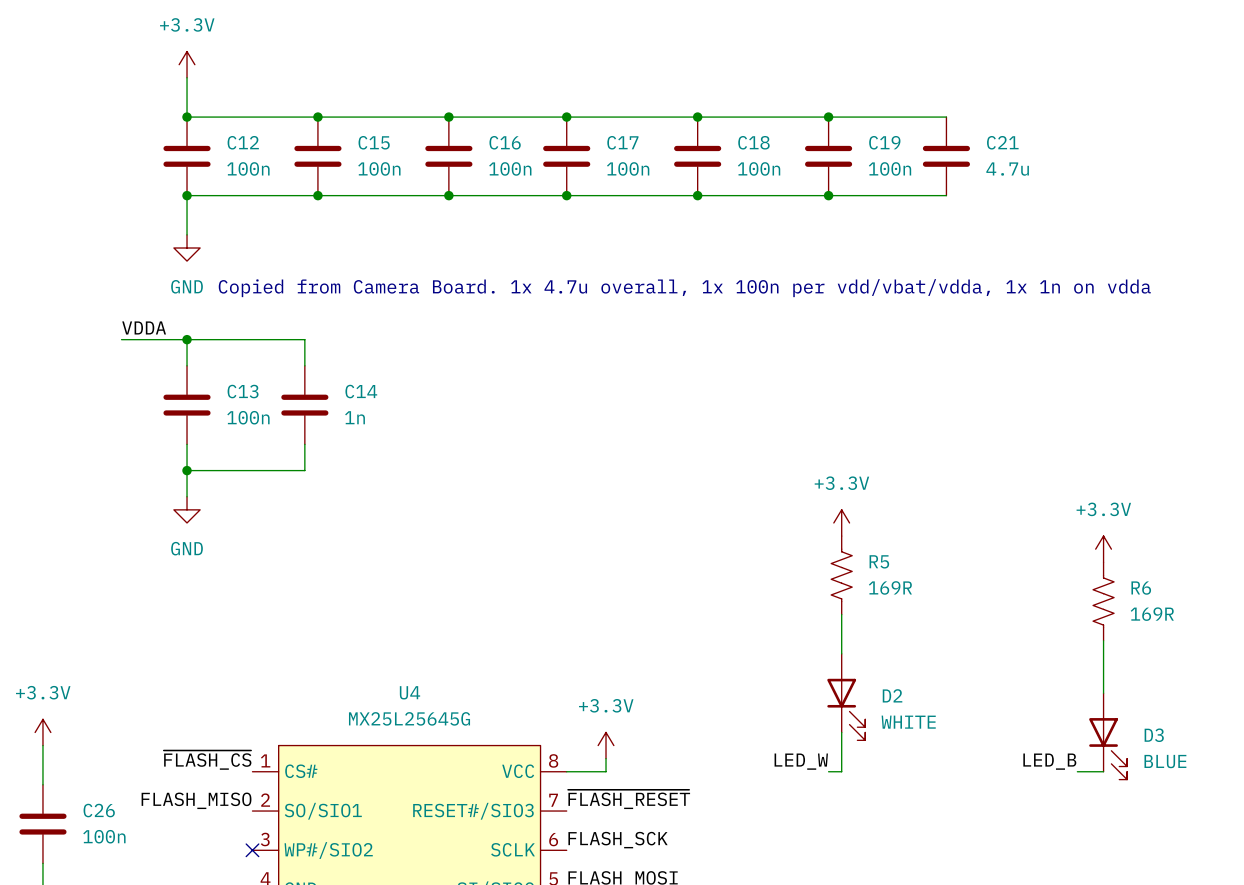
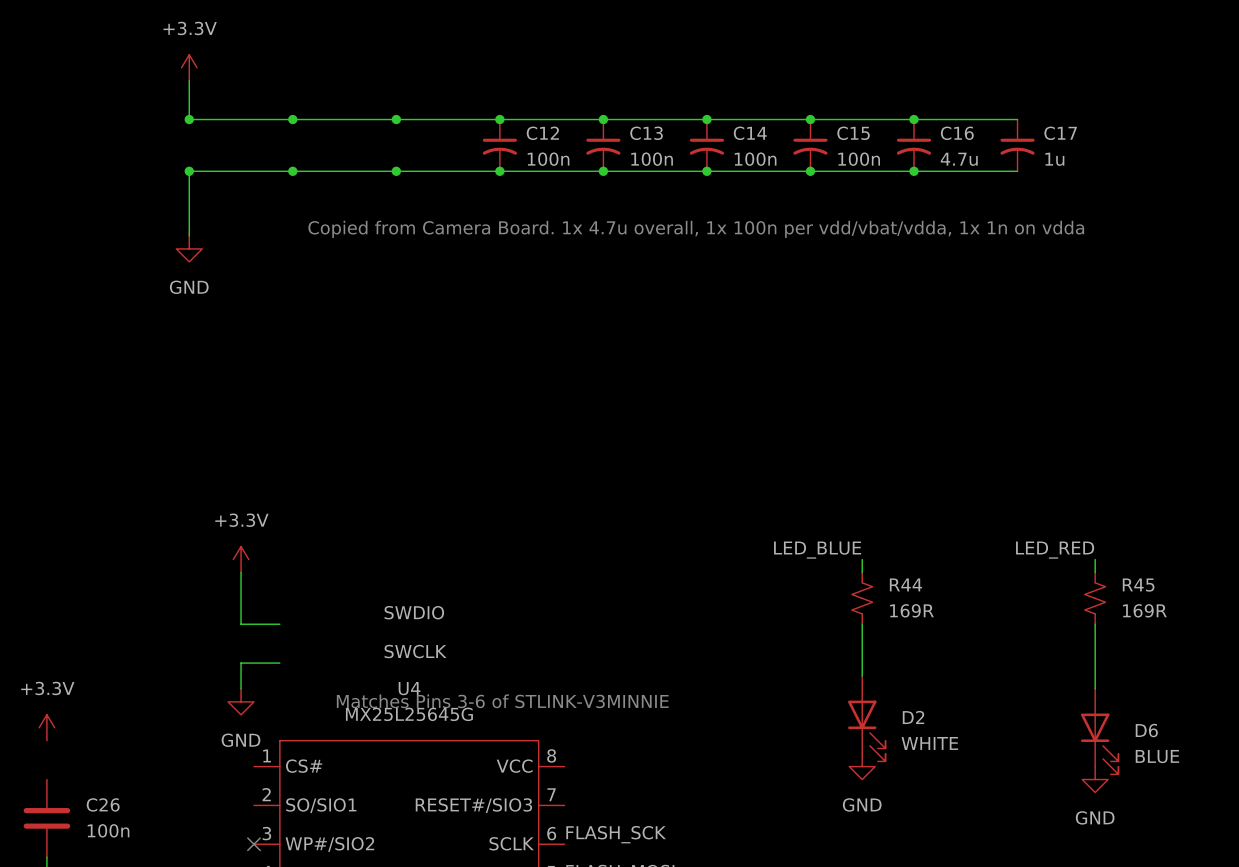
C12 symbol: [163, 117, 211, 196] -> [482, 119, 517, 172]
C15 symbol: [294, 117, 342, 196] -> [793, 119, 828, 172]
junction position: (317, 117) -> (292, 119)
junction: none -> (396, 119)
C16 symbol: [425, 117, 473, 196] -> [896, 119, 932, 172]
junction: (448, 117) -> none
junction: none -> (499, 119)
C17 symbol: [543, 117, 591, 196] -> [1000, 119, 1035, 172]
junction: (566, 117) -> none
junction: none -> (603, 119)
junction position: (697, 117) -> (706, 119)
junction position: (828, 117) -> (810, 119)
junction: none -> (913, 119)
wire: none -> (939, 119) (1017, 119)
C18: 100n (697, 156) -> none
C19: 100n (828, 156) -> none
C21: 4.7u (946, 156) -> none
C16 value: 100n (510, 168) -> 4.7u (959, 159)
C17 value: 100n (628, 168) -> 1u (1054, 159)
junction: none -> (292, 171)
junction: none -> (396, 171)
junction: none -> (499, 171)
junction: none -> (603, 171)
junction: none -> (706, 171)
junction: none -> (810, 171)
junction: none -> (913, 171)
wire: (187, 195) (946, 195) -> (189, 197) (189, 171) (1017, 171)
junction position: (187, 195) -> (189, 171)
junction: (317, 195) -> none
junction: (448, 195) -> none
junction: (566, 195) -> none
junction: (697, 195) -> none
junction: (828, 195) -> none
text position: Copied from Camera Board. 1x 4.7u overall, 1x 100n per vdd/vbat/vdda, 1x 1n on vdda (684, 288) -> Copied from Camera Board. 1x 4.7u overall, 1x 100n per vdd/vbat/vdda, 1x 1n on vdda (696, 229)
label: VDDA (144, 327) -> none
wire: (121, 339) (304, 339) (304, 365) -> none
wire: (187, 339) (187, 365) -> none
junction: (187, 339) -> none
C13 symbol: [163, 365, 211, 445] -> [586, 119, 621, 172]
C14 symbol: [281, 365, 329, 445] -> [689, 119, 725, 172]
C14 value: 1n (355, 417) -> 100n (755, 159)
wire: (187, 444) (187, 496) -> none
wire: (304, 444) (304, 470) (187, 470) -> none
junction: (187, 470) -> none
power symbol: GND (187, 509) -> none
power symbol: +3.3V (841, 522) -> none
power symbol: +3.3V (1103, 549) -> none
label: none -> LED_BLUE (817, 550)
label: none -> LED_RED (1055, 550)
power symbol: none -> +3.3V (241, 559)
wire: none -> (862, 559) (862, 572)
wire: none -> (241, 572) (241, 624) (279, 624)
R5: 169R (841, 575) -> none
R44: none -> 169R (862, 598)
R6: 169R (1103, 601) -> none
R45: none -> 169R (1095, 598)
wire: (841, 614) (841, 653) -> none
label: none -> SWDIO (414, 612)
wire: none -> (862, 624) (862, 676)
label: none -> SWCLK (415, 651)
wire: none -> (279, 663) (241, 663) (241, 688)
D2 position: (846, 697) -> (866, 718)
text: none -> Matches Pins 3-6 of STLINK-V3MINNIE (502, 701)
power symbol: none -> GND (241, 701)
wire: (841, 732) (841, 771) (828, 771) -> none
D3 name: D3 (1154, 735) -> D6 (1146, 730)
wire: (42, 745) (42, 784) -> none
power symbol: +3.3V (606, 745) -> none
wire: (606, 758) (606, 771) (566, 771) -> none
label: ~{FLASH_CS} (207, 760) -> none
label: LED_W (801, 761) -> none
label: LED_B (1049, 761) -> none
power symbol: none -> GND (862, 766)
wire: (1077, 771) (1103, 771) -> none
power symbol: none -> GND (1095, 779)
label: ~{FLASH_RESET} (629, 799) -> none
label: FLASH_MISO (196, 800) -> none

